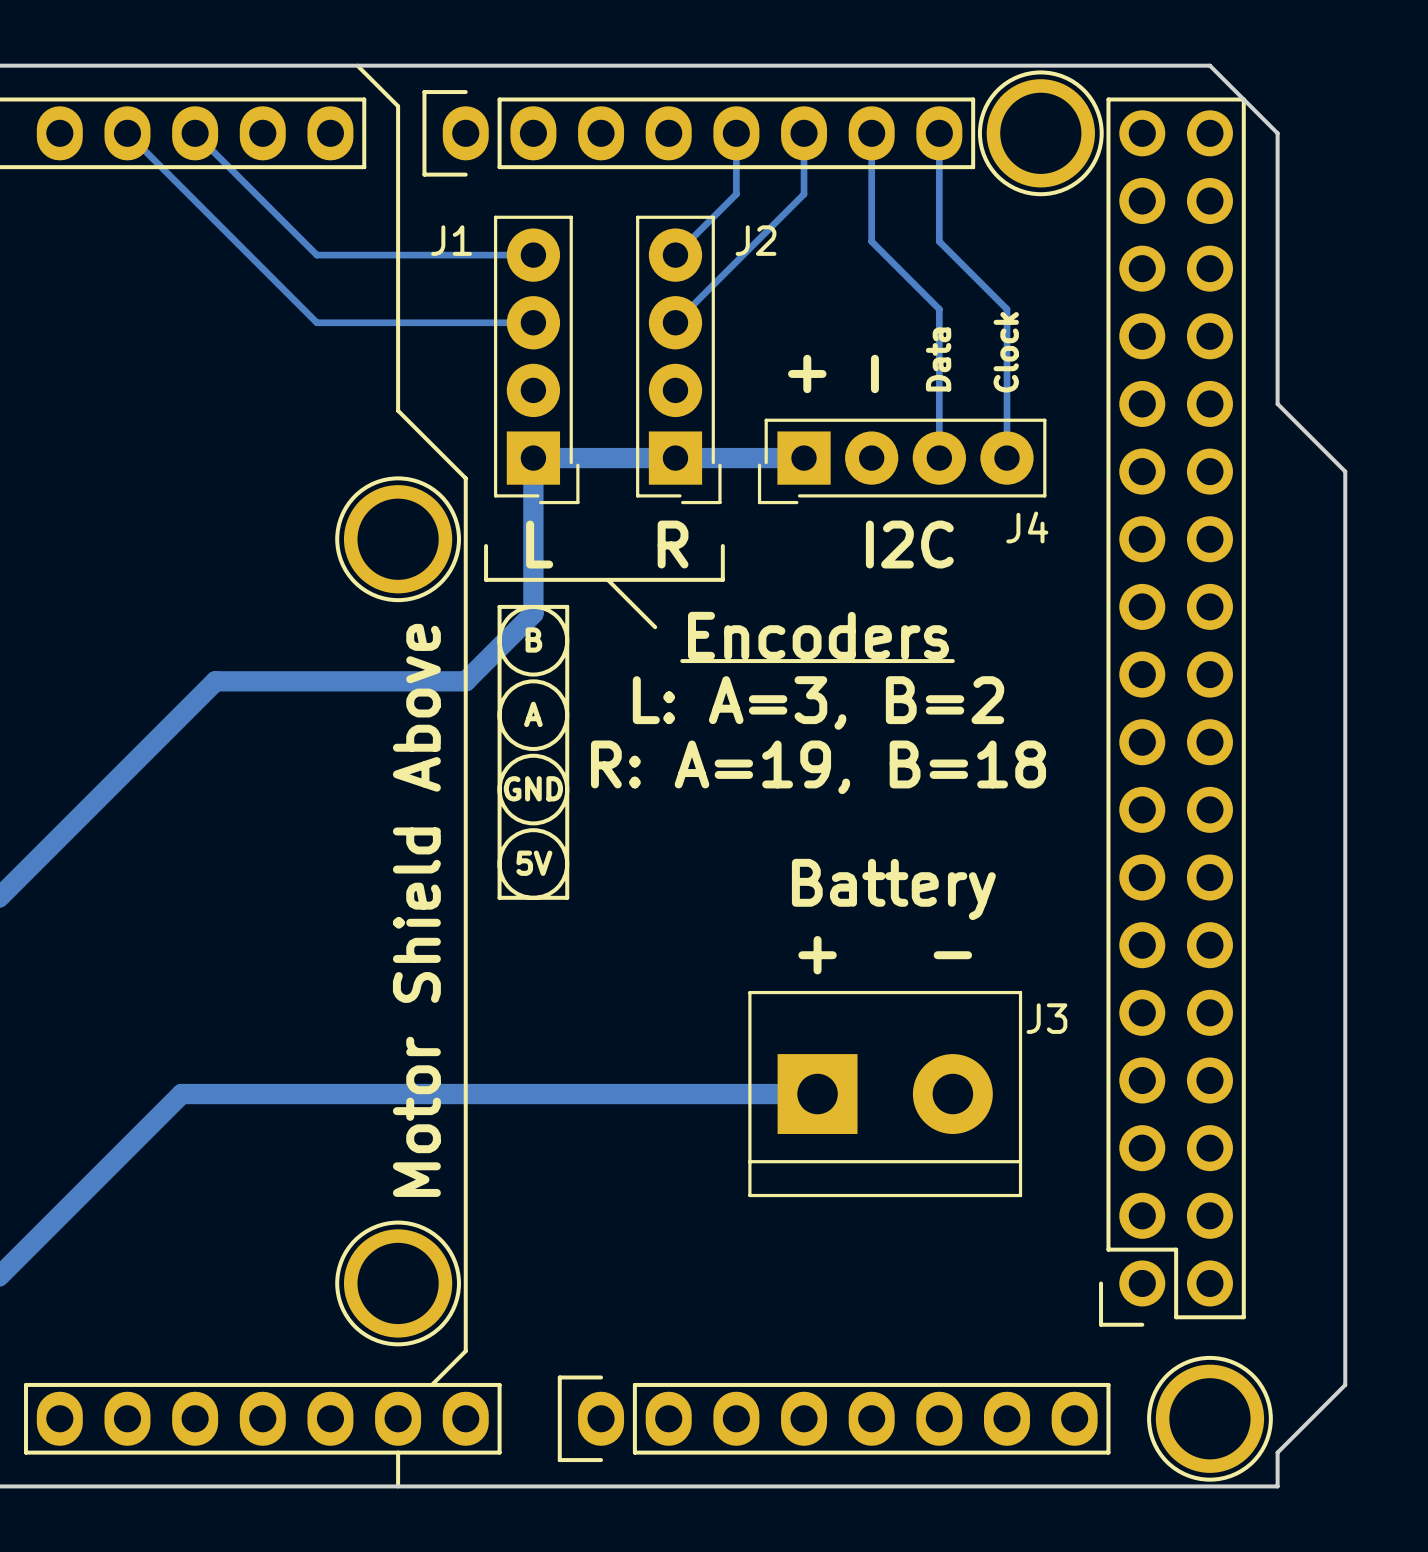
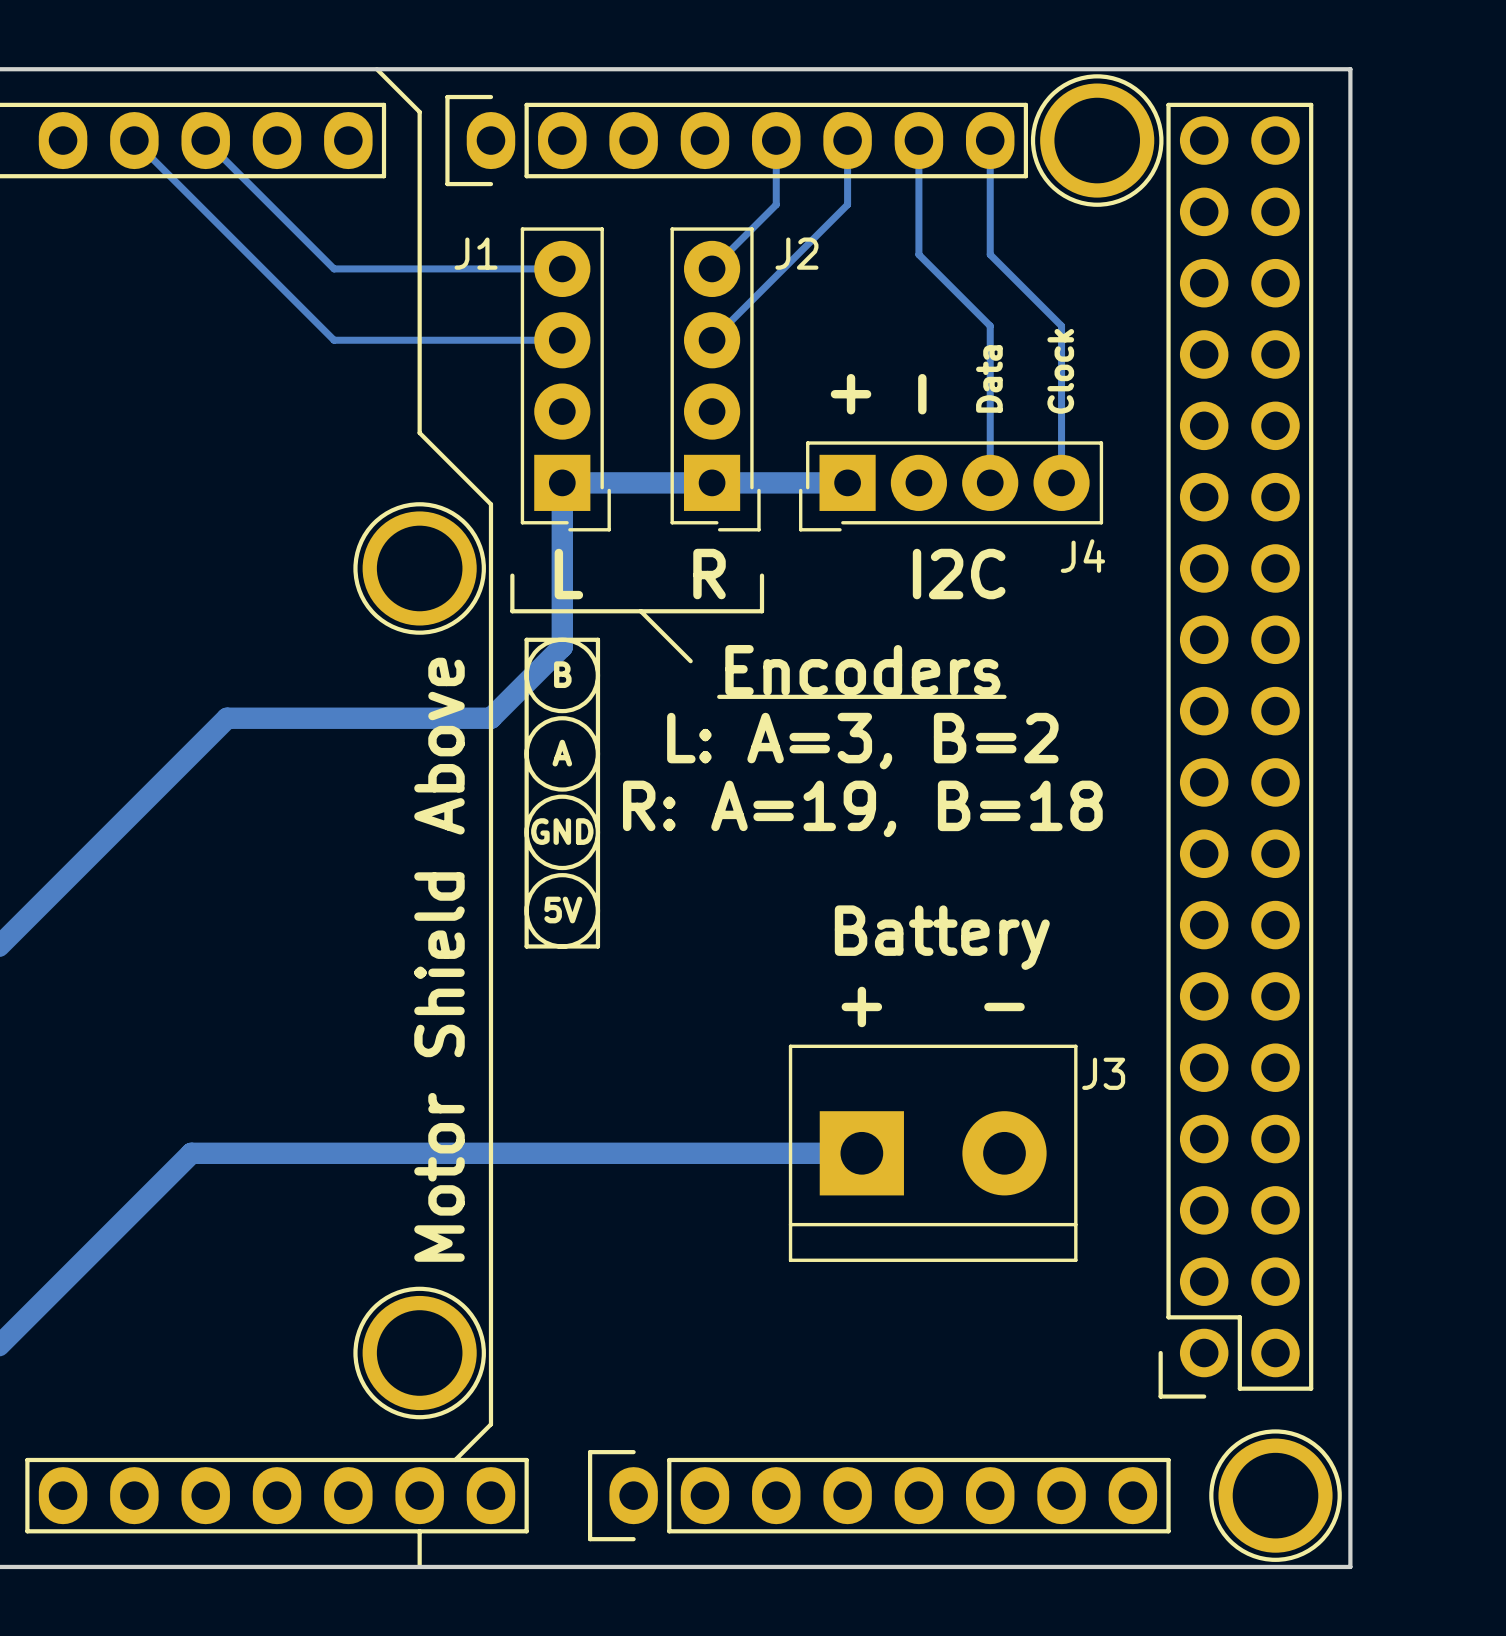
board edge: (1209, 65) (1277, 133) (1277, 403) (1345, 471) (1345, 1384) (1277, 1452) (1277, 1486) -> (1275, 69) (1350, 69) (1350, 1566) (1346, 1566)

